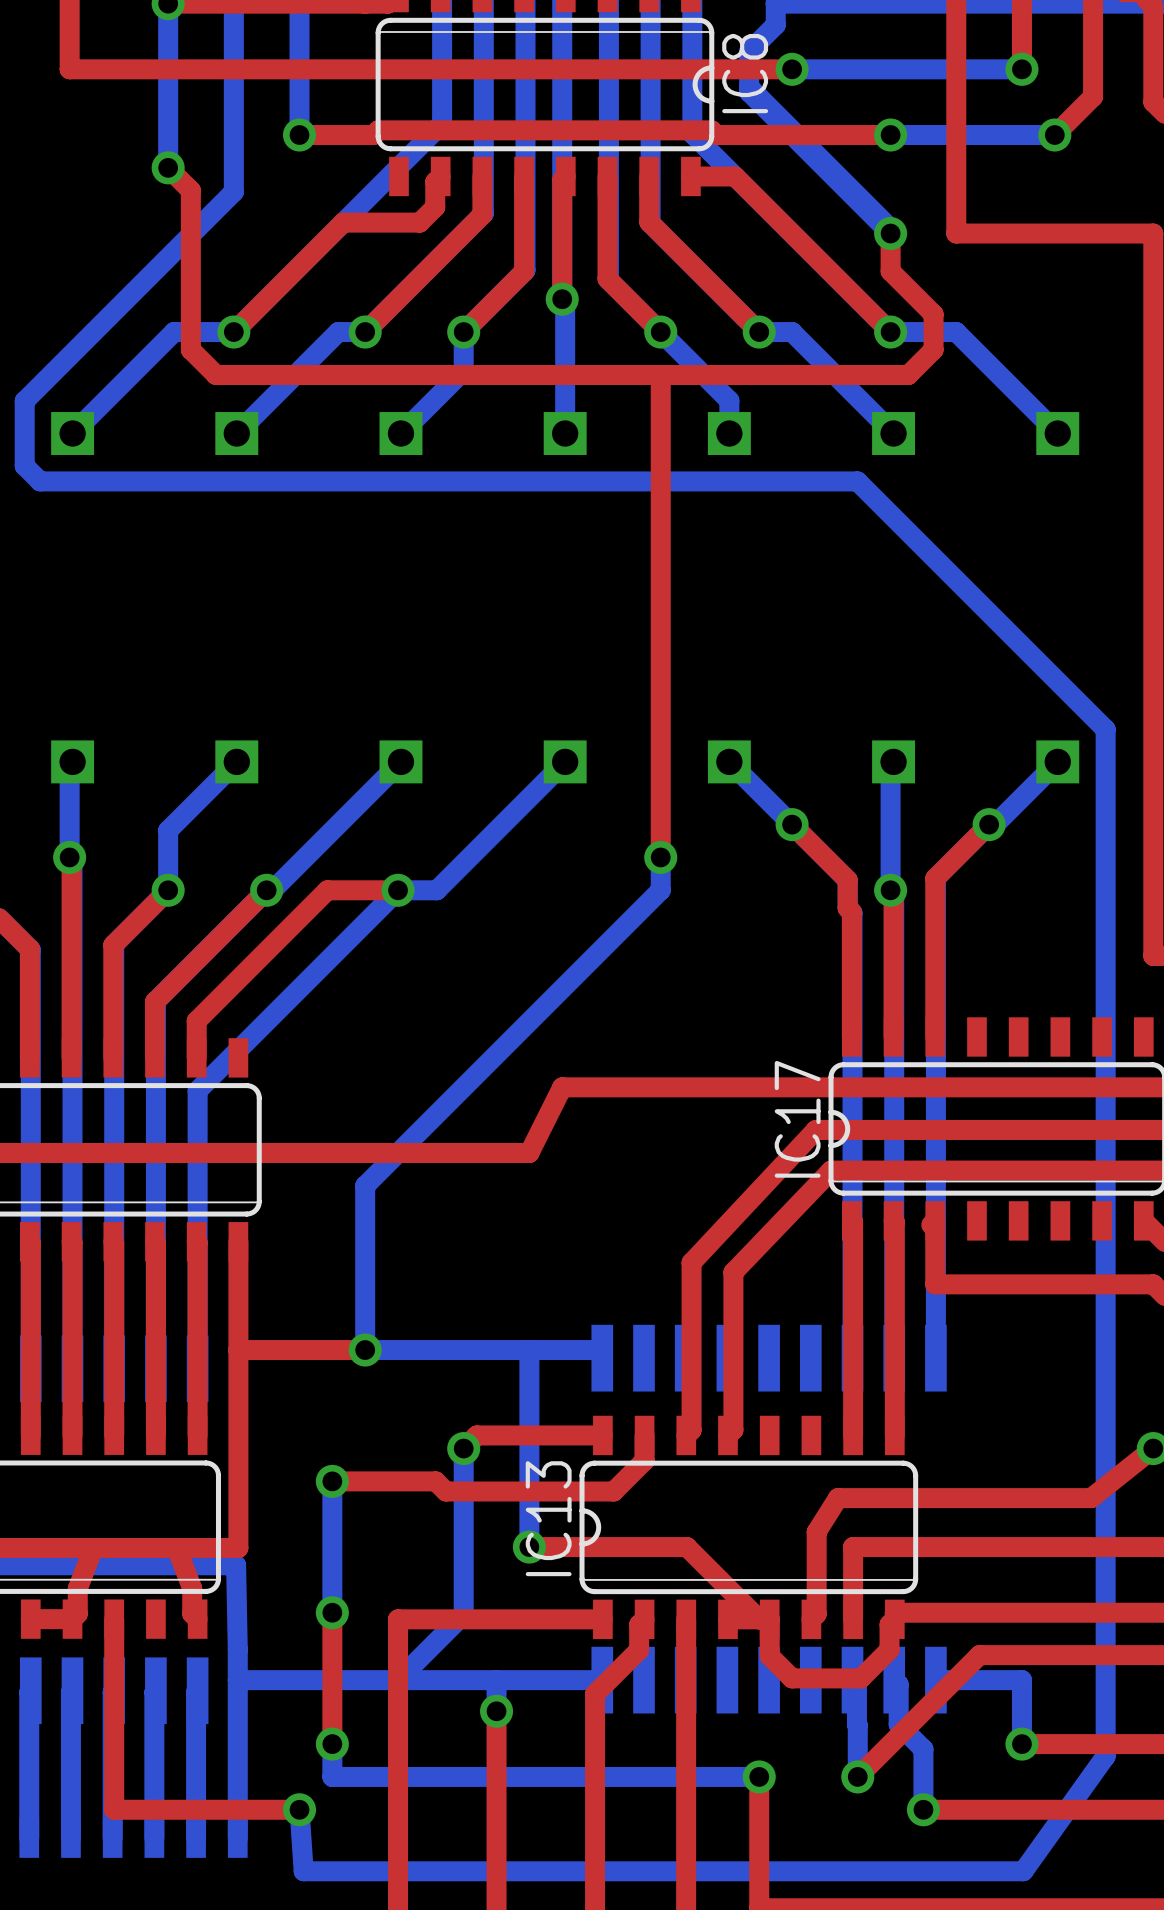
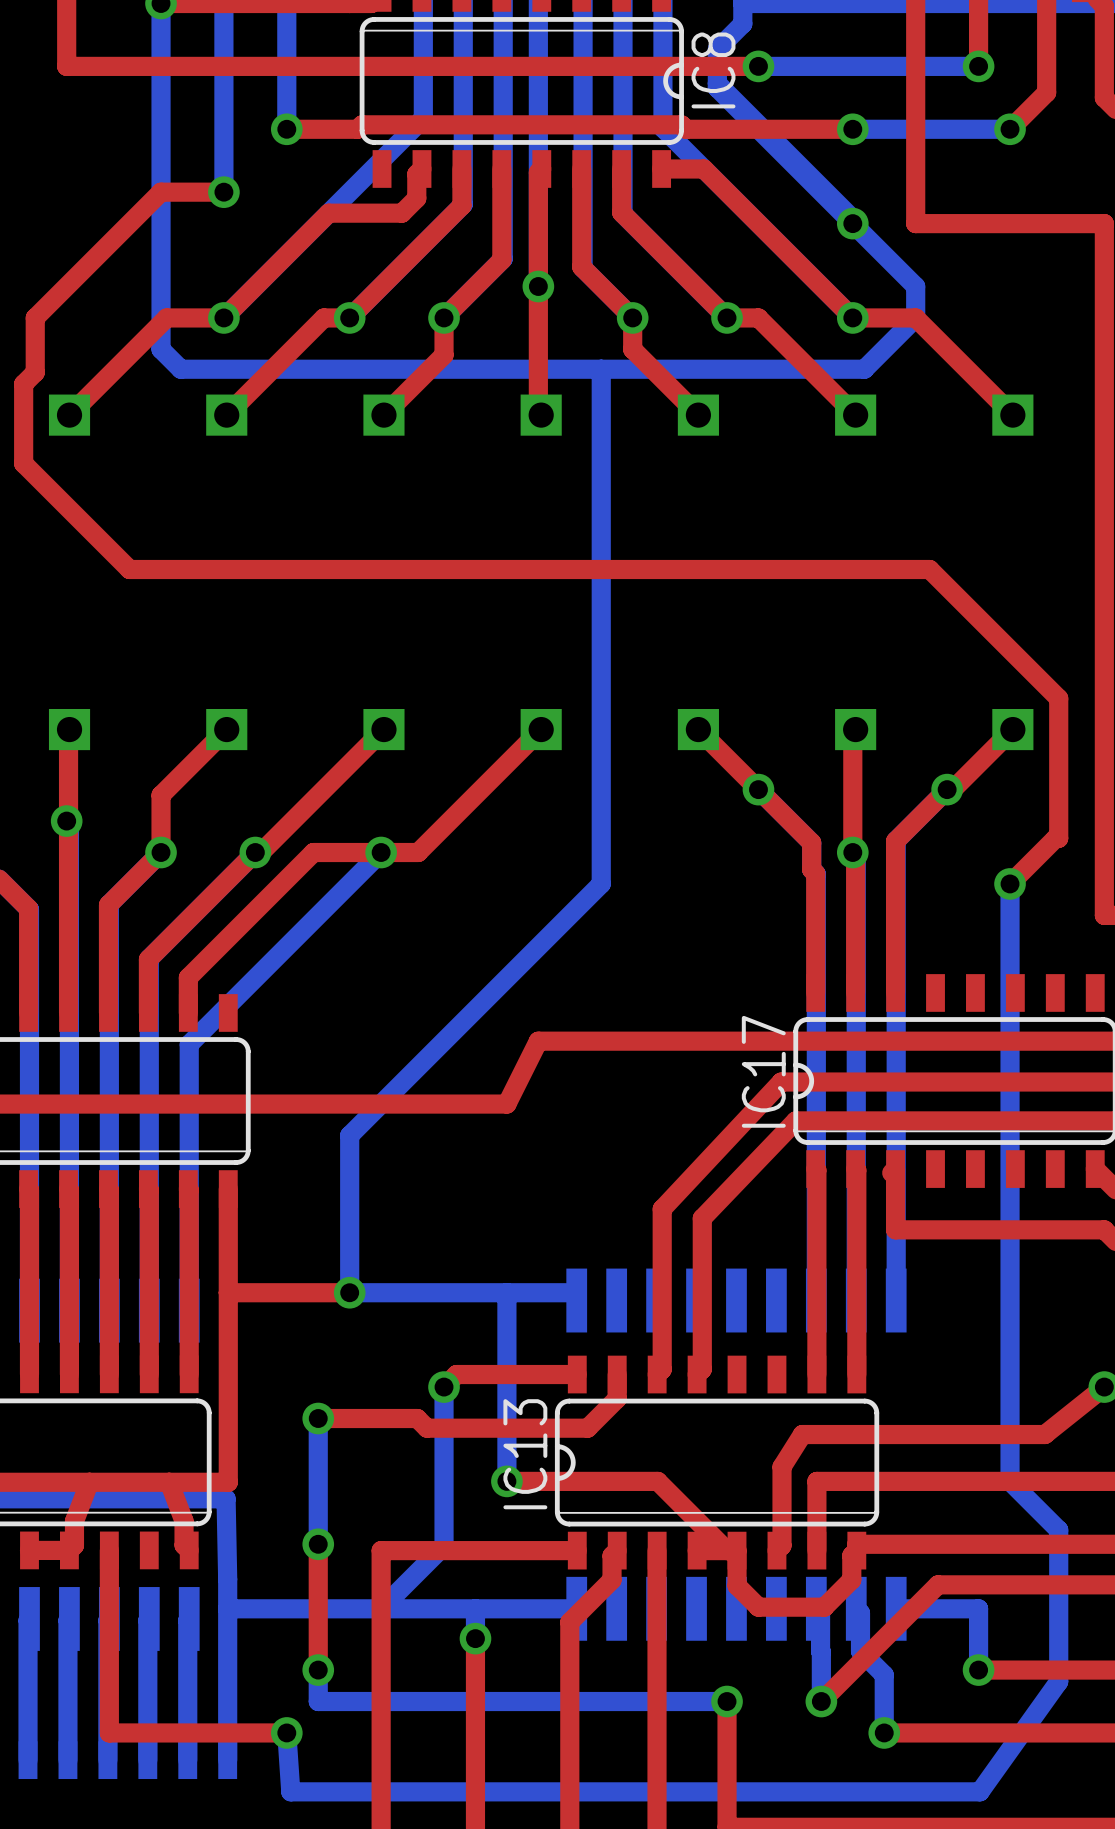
top track: (168, 167) (190, 190) (190, 349) (216, 375) (908, 375) (933, 349) (933, 314) (890, 271) (890, 233) -> none
bottom track: none -> (161, 160) (161, 349) (180, 369) (864, 369) (915, 317) (915, 286) (852, 223)
via position: (168, 167) -> (223, 192)
bottom track: (233, 191) (24, 401) (24, 465) (40, 481) (857, 481) (1105, 729) (1105, 1597) -> (1010, 883) (1010, 1481) (1058, 1530)
top track: none -> (223, 192) (161, 192) (35, 317) (35, 372) (23, 384) (23, 463) (129, 569) (929, 569) (1058, 698) (1058, 838) (1055, 838) (1010, 883)
top track: none -> (538, 286) (538, 412) (541, 415)
bottom track: (565, 302) (565, 433) -> none
top track: none -> (223, 317) (166, 317) (69, 415)
bottom track: (233, 332) (174, 332) (72, 433) -> none
top track: none -> (349, 317) (323, 317) (226, 415)
bottom track: (365, 332) (338, 332) (236, 433) -> none
top track: none -> (444, 317) (444, 355) (383, 415)
bottom track: (463, 332) (463, 370) (400, 433) -> none
top track: none -> (632, 317) (632, 349) (698, 415)
bottom track: (660, 332) (729, 400) (729, 433) -> none
top track: none -> (727, 317) (758, 317) (855, 415)
bottom track: (759, 332) (792, 332) (893, 433) -> none
top track: none -> (852, 317) (915, 317) (1012, 415)
bottom track: (890, 332) (956, 332) (1057, 433) -> none
top track: (660, 375) (660, 857) -> none
top track: none -> (69, 729) (68, 822)
bottom track: (72, 761) (69, 764) (69, 857) -> none
top track: none -> (226, 729) (161, 795) (161, 852)
bottom track: (236, 761) (168, 830) (168, 890) -> none
top track: none -> (383, 729) (261, 852) (255, 852)
bottom track: (400, 761) (272, 890) -> none
top track: none -> (541, 729) (418, 852) (381, 852)
bottom track: (565, 761) (436, 890) (398, 890) -> none
top track: none -> (698, 729) (758, 789)
bottom track: (729, 761) (792, 824) -> none
top track: none -> (855, 729) (852, 732) (852, 852)
bottom track: (893, 761) (890, 764) (890, 890) -> none
top track: none -> (1012, 729) (952, 789) (947, 789)
bottom track: (1057, 761) (995, 824) -> none
bottom track: (660, 857) (660, 890) (627, 923) -> (601, 369) (601, 883)
via: (660, 857) -> none
via: none -> (1010, 883)

